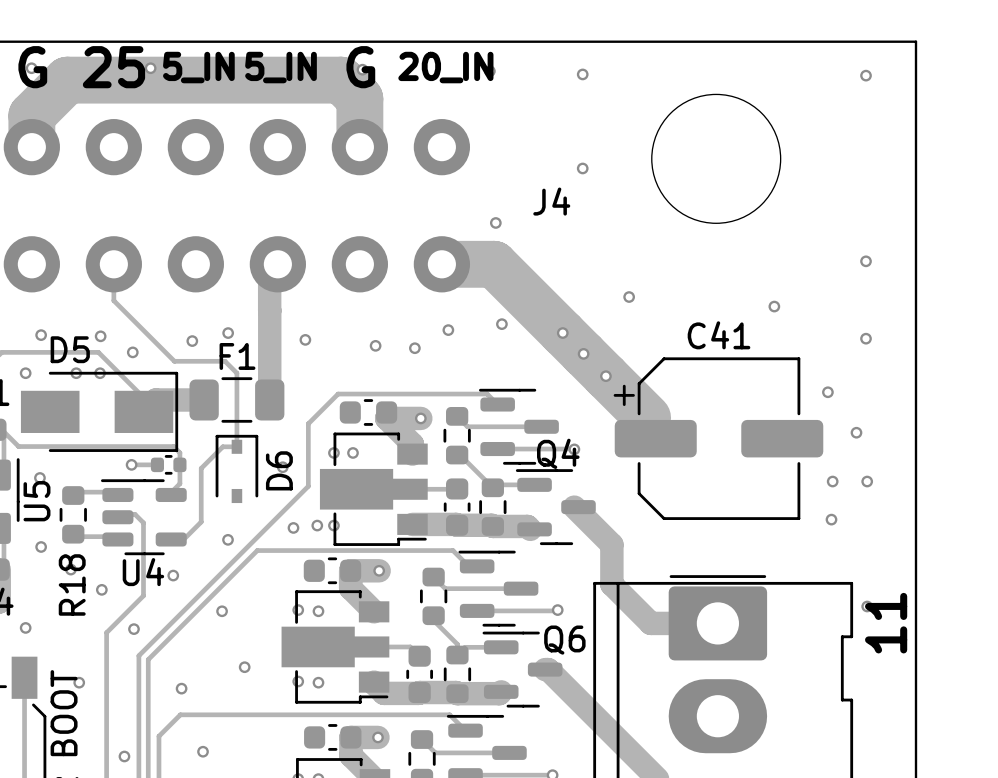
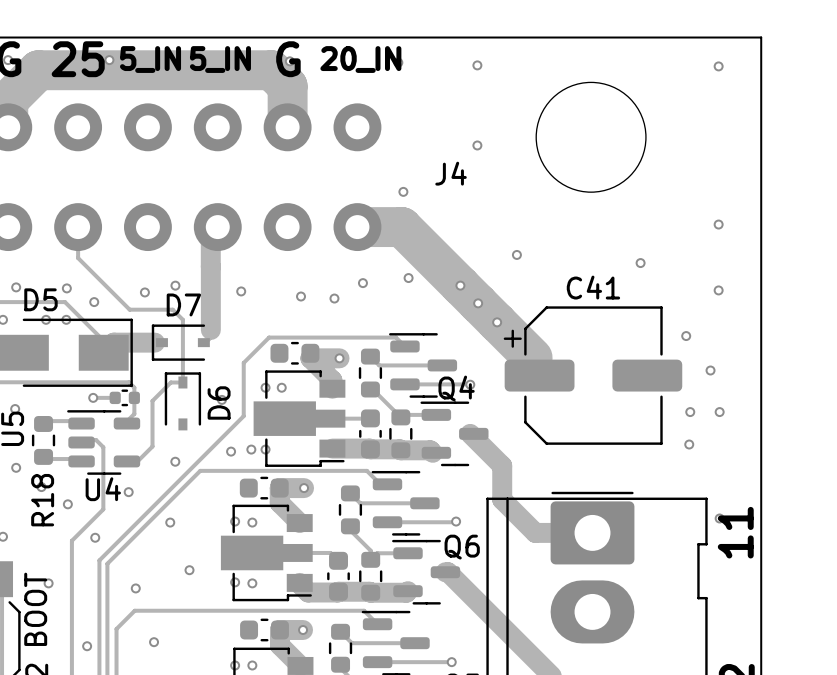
D7: none -> (180, 342)
F1: (236, 399) -> none

